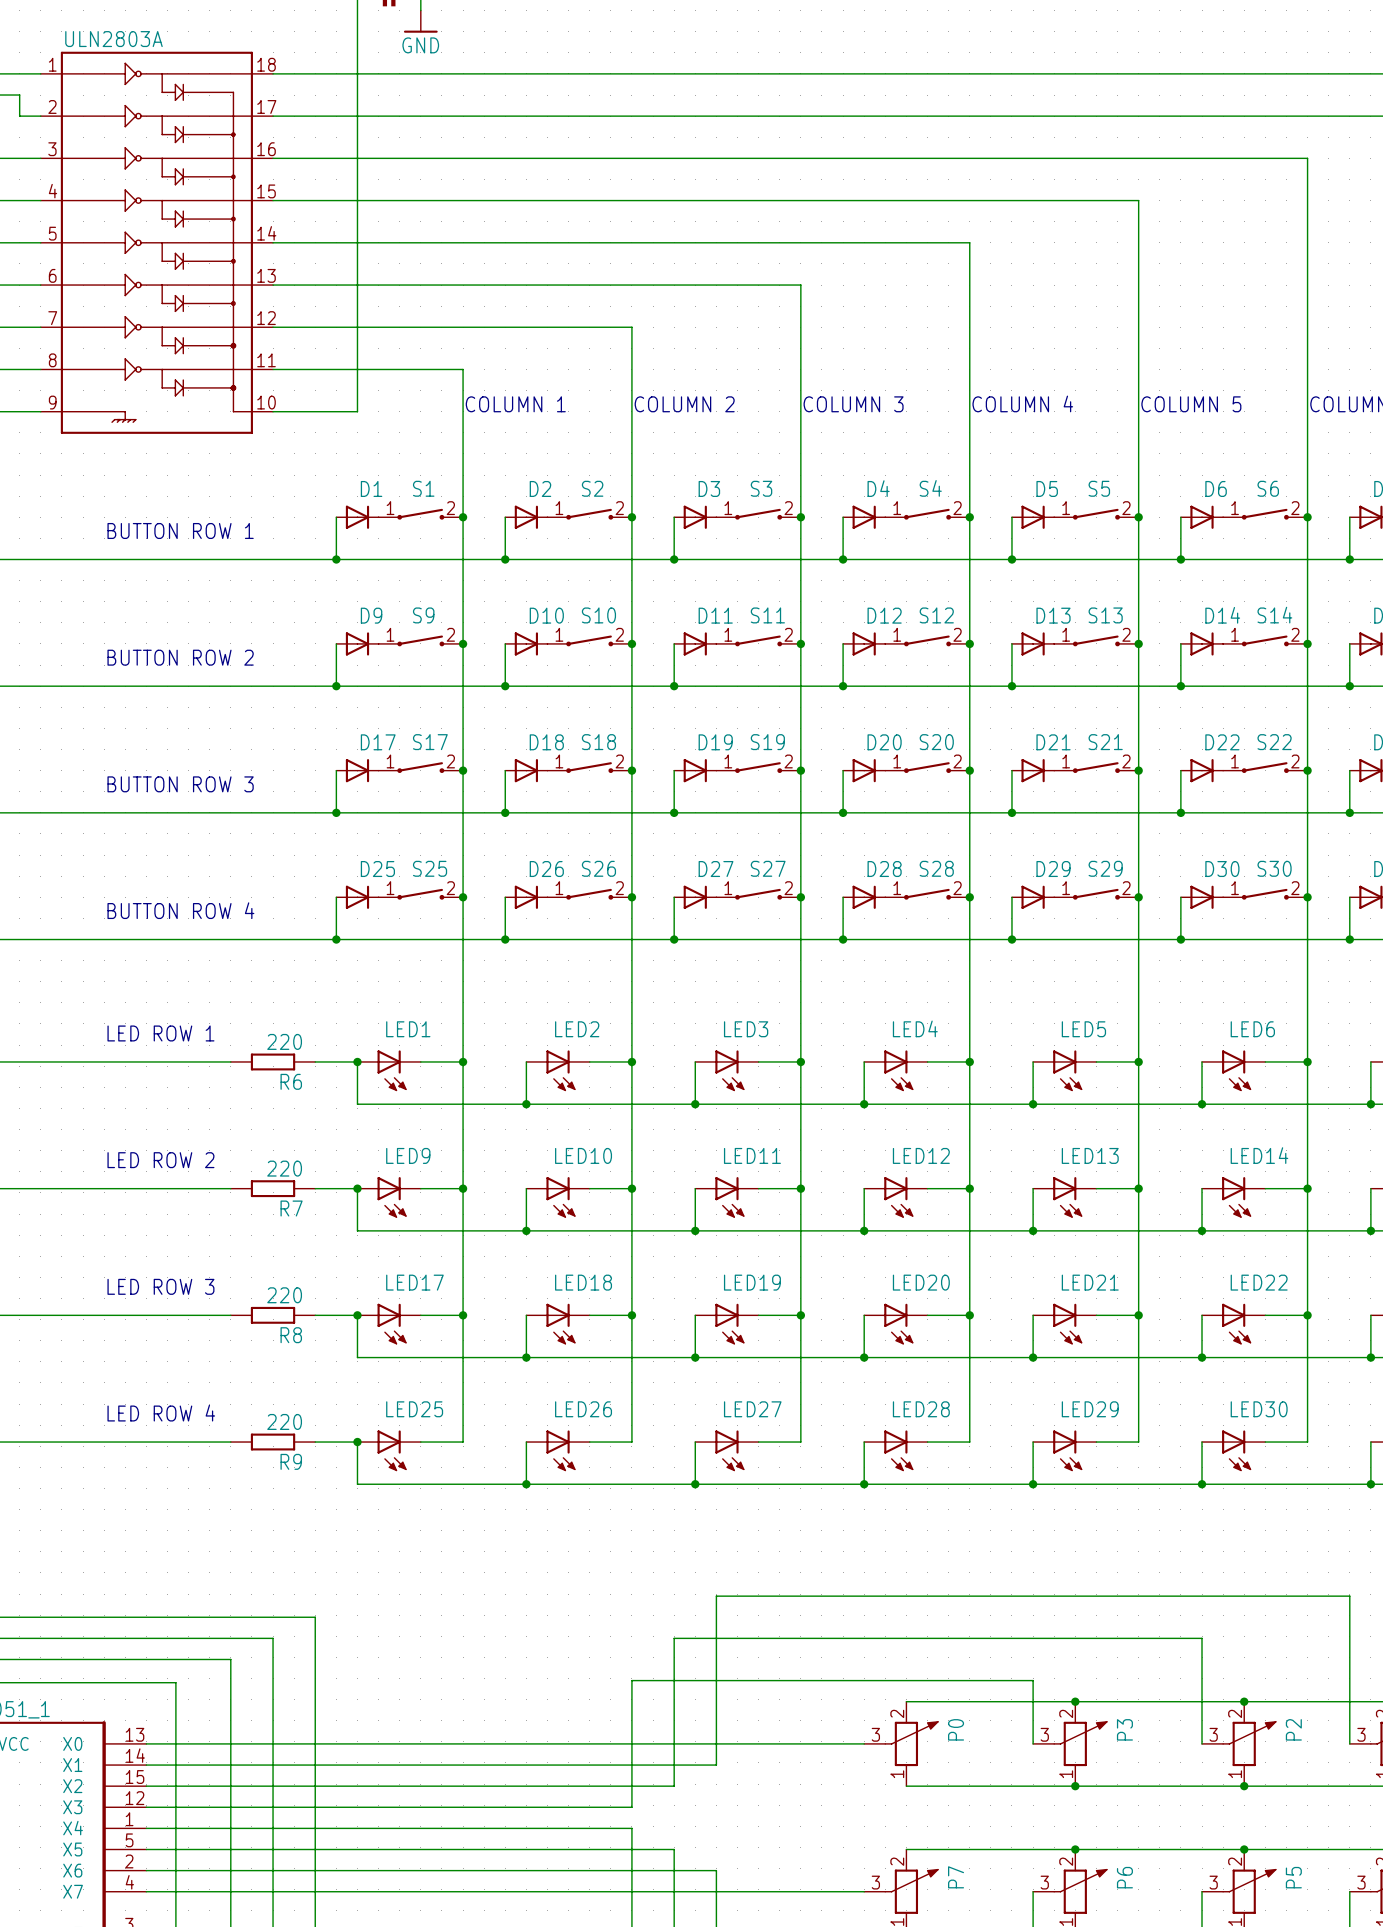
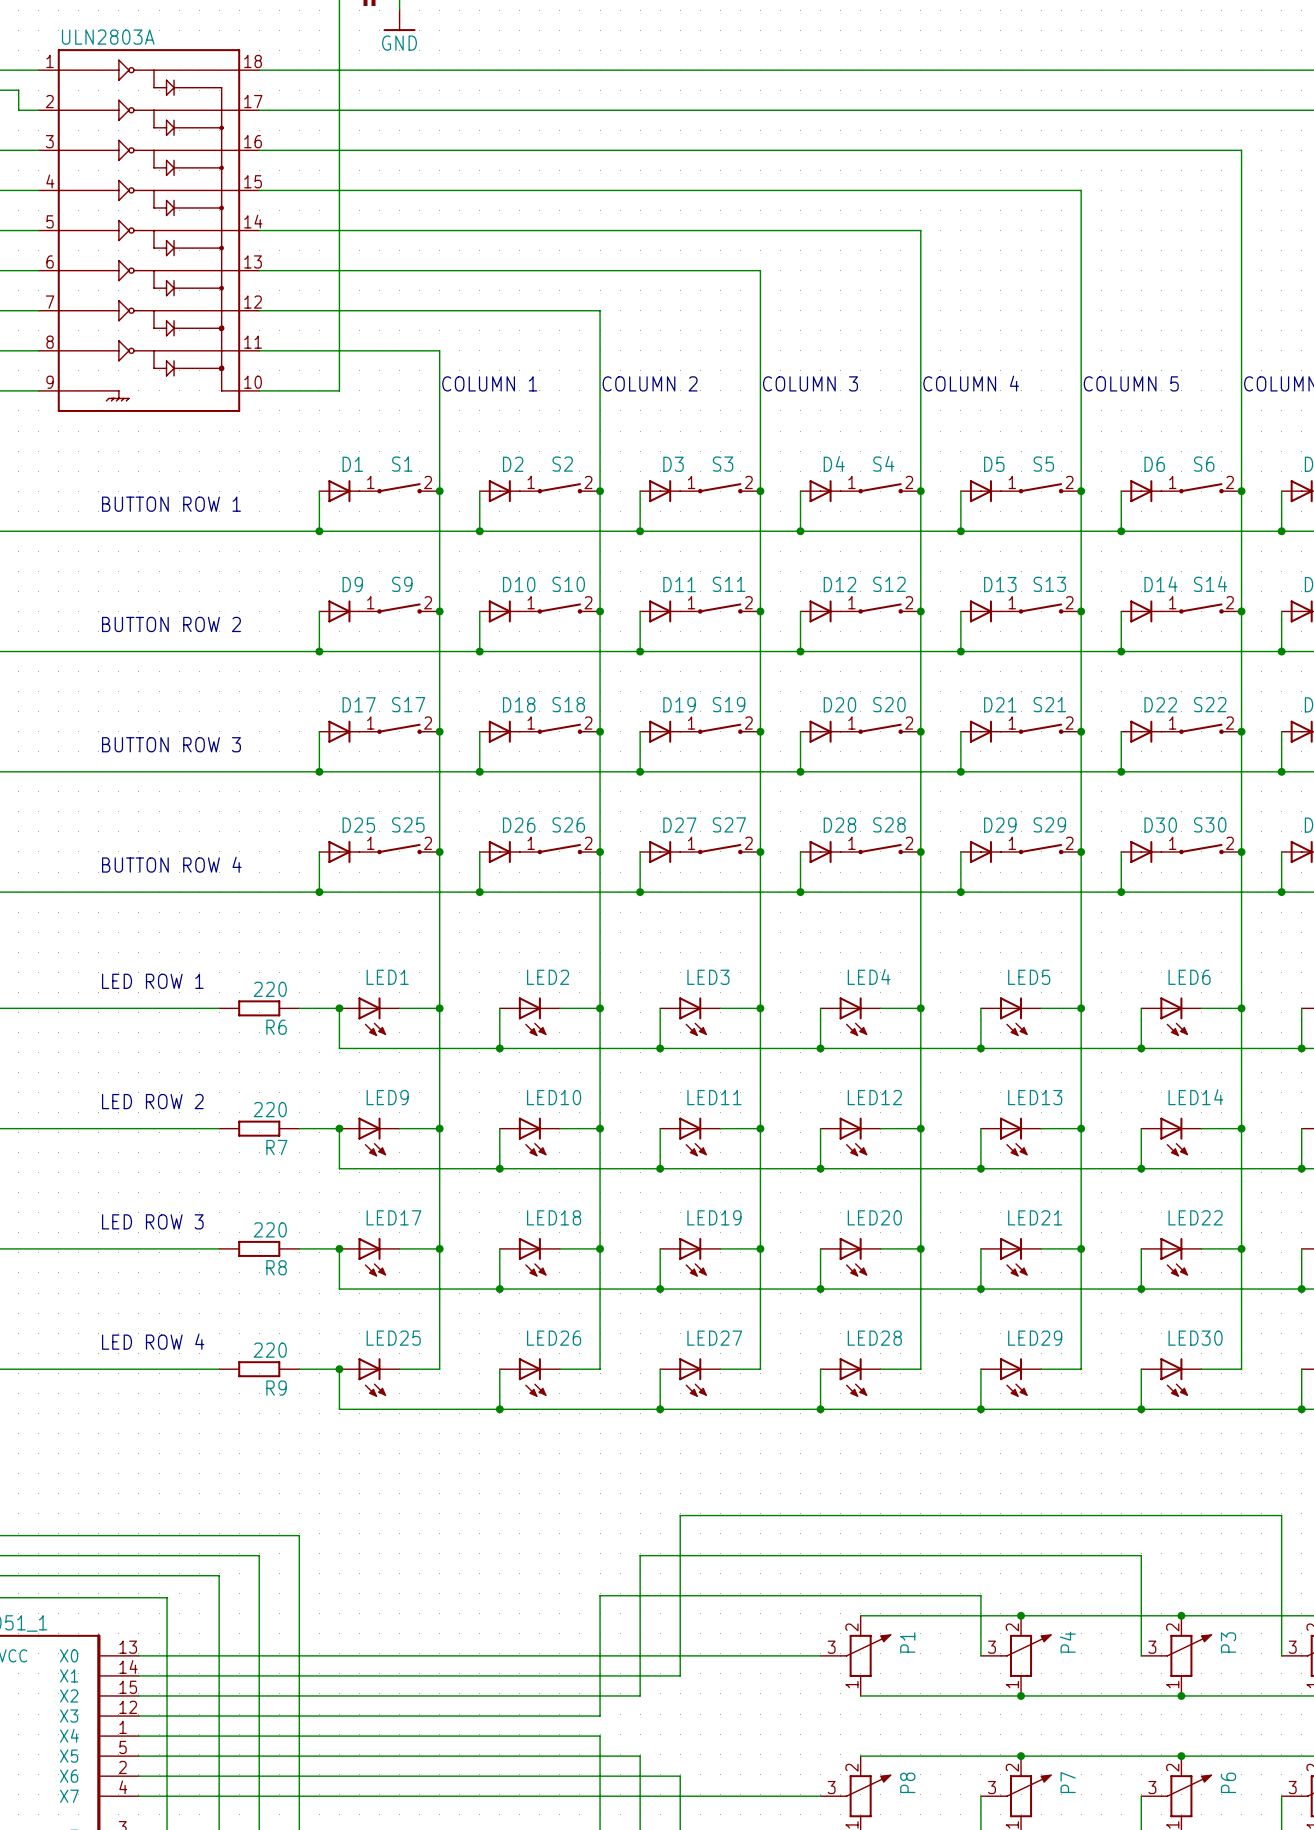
P0 name: P0 (956, 1729) -> P1 (907, 1642)
P3 name: P3 (1124, 1729) -> P4 (1067, 1642)
P2 name: P2 (1293, 1729) -> P3 (1228, 1642)
P7 name: P7 (956, 1877) -> P8 (907, 1782)
P6 name: P6 (1124, 1877) -> P7 (1068, 1782)
P5 name: P5 (1293, 1877) -> P6 (1228, 1782)

